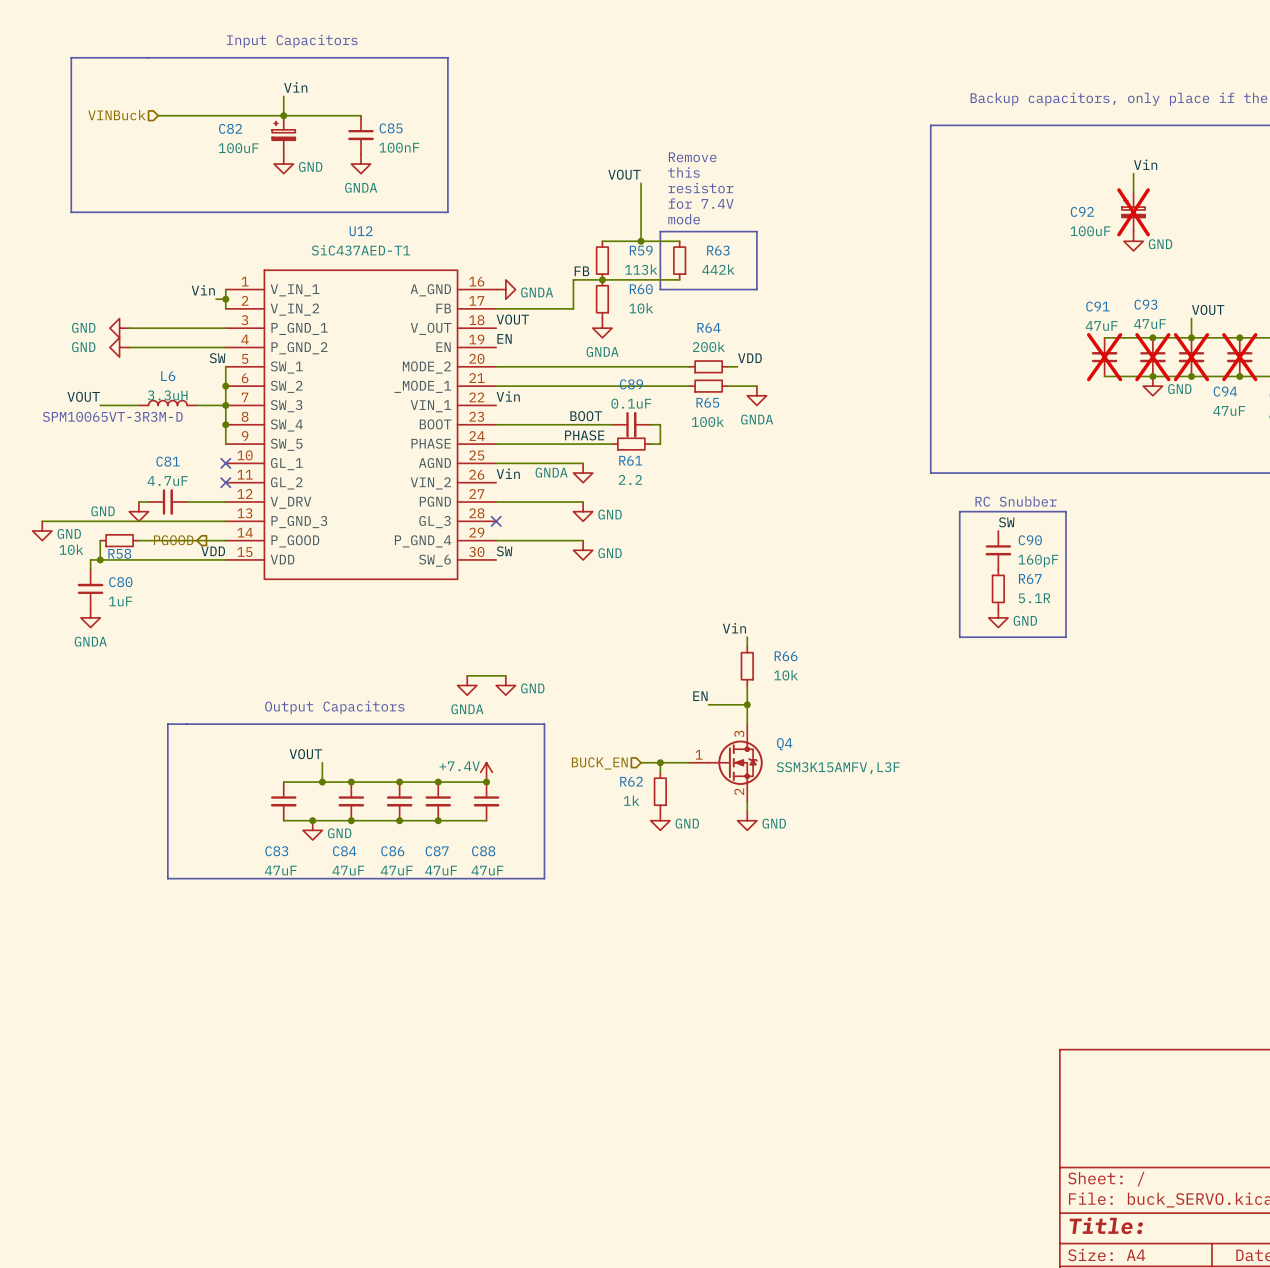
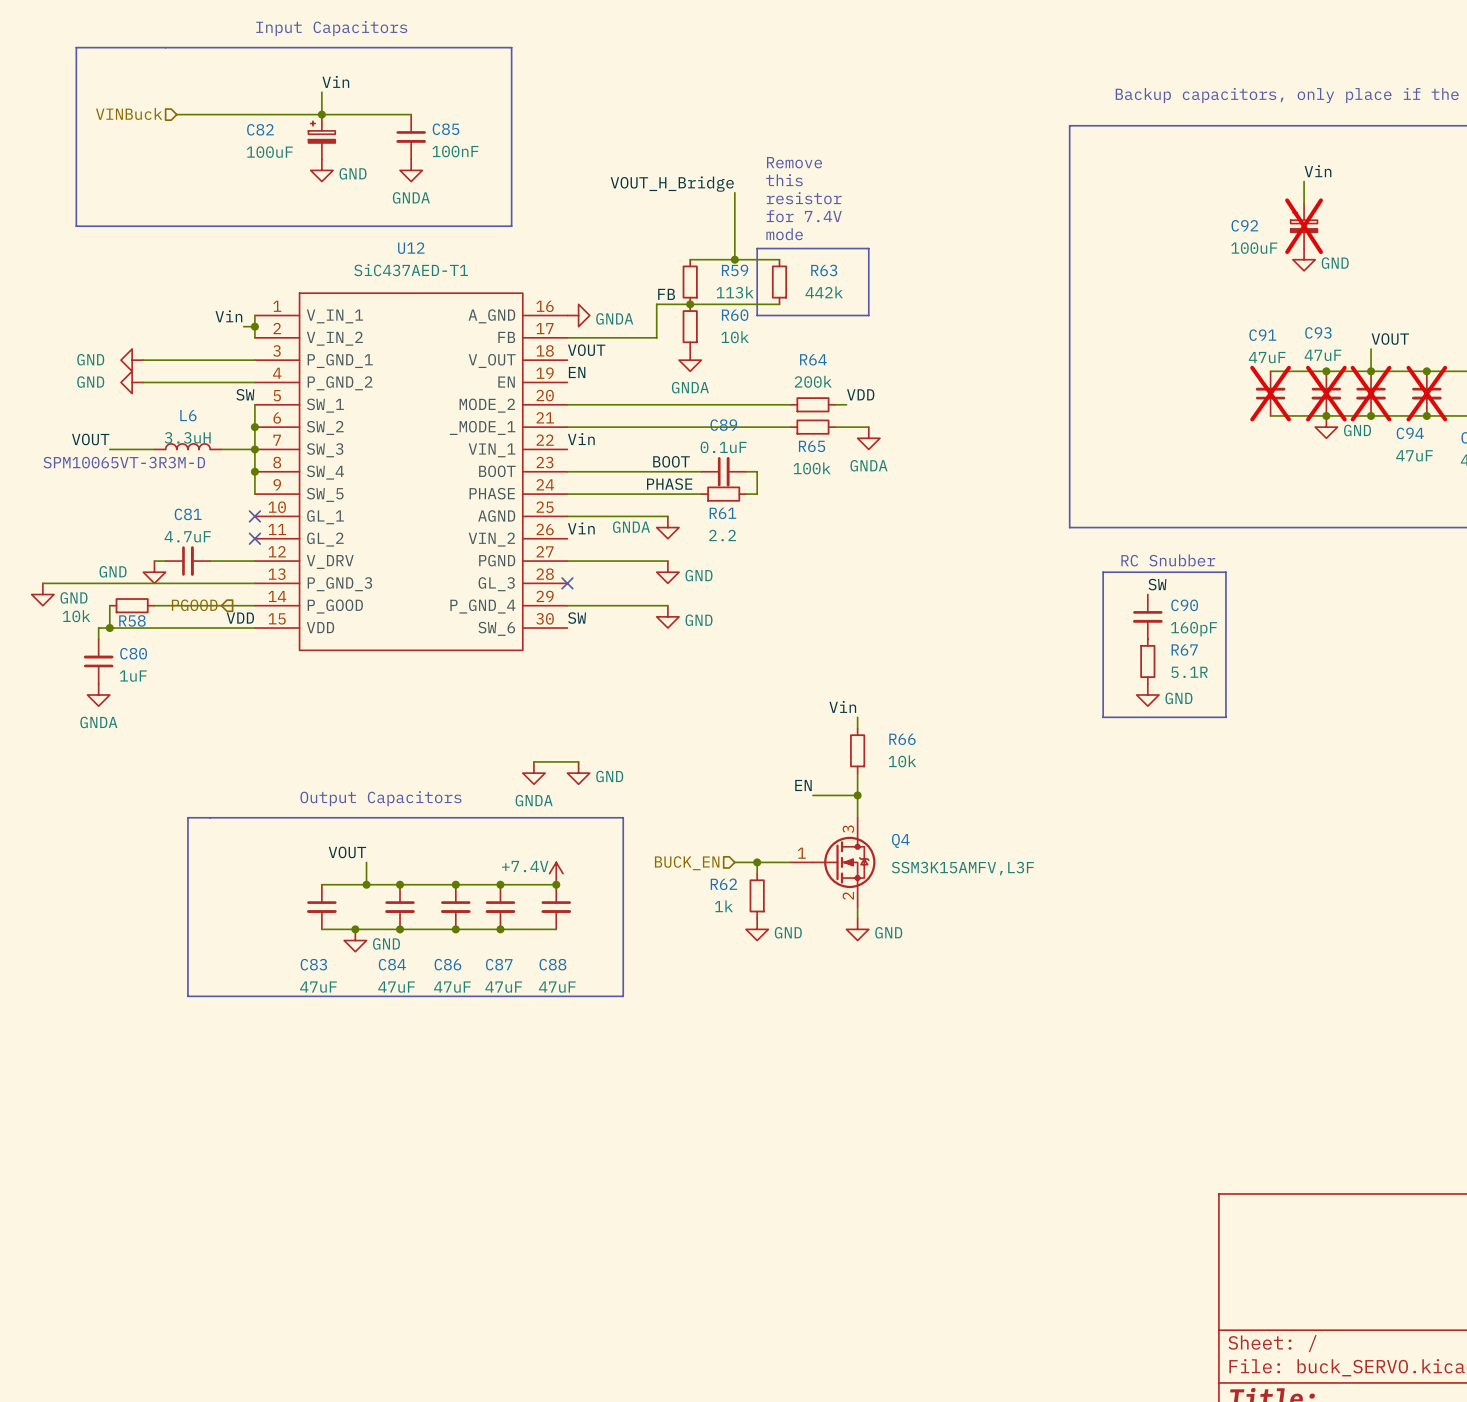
label: VOUT (624, 174) -> VOUT_H_Bridge (672, 184)

